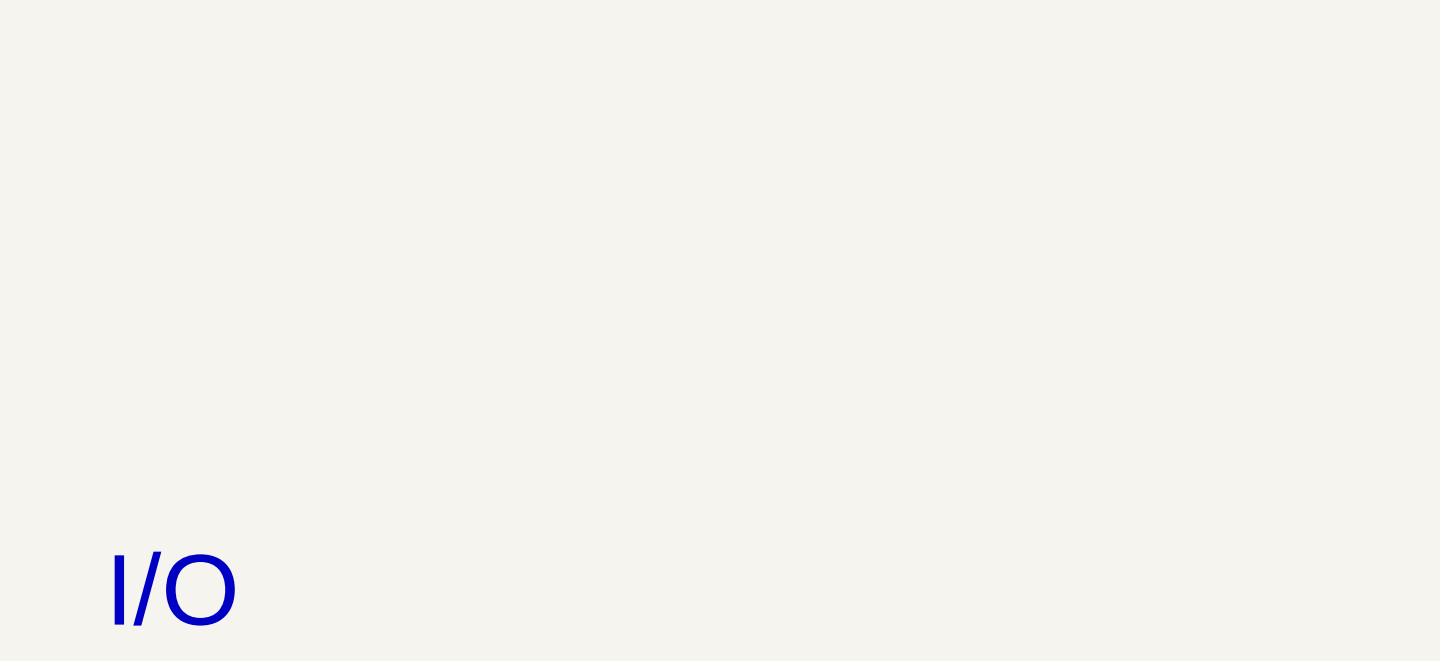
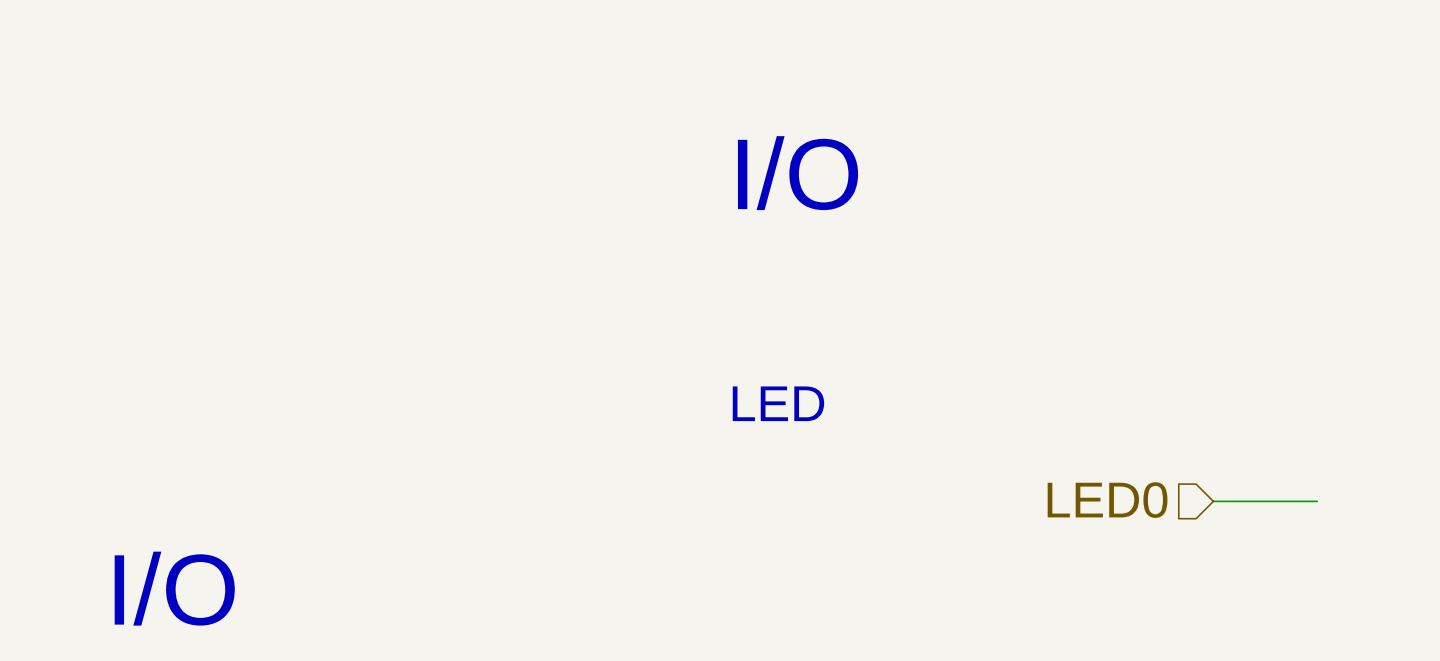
text: none -> I/O (798, 173)
text: none -> LED (778, 403)
hierarchical label: none -> LED0 (1107, 500)
wire: none -> (1213, 501) (1317, 501)

